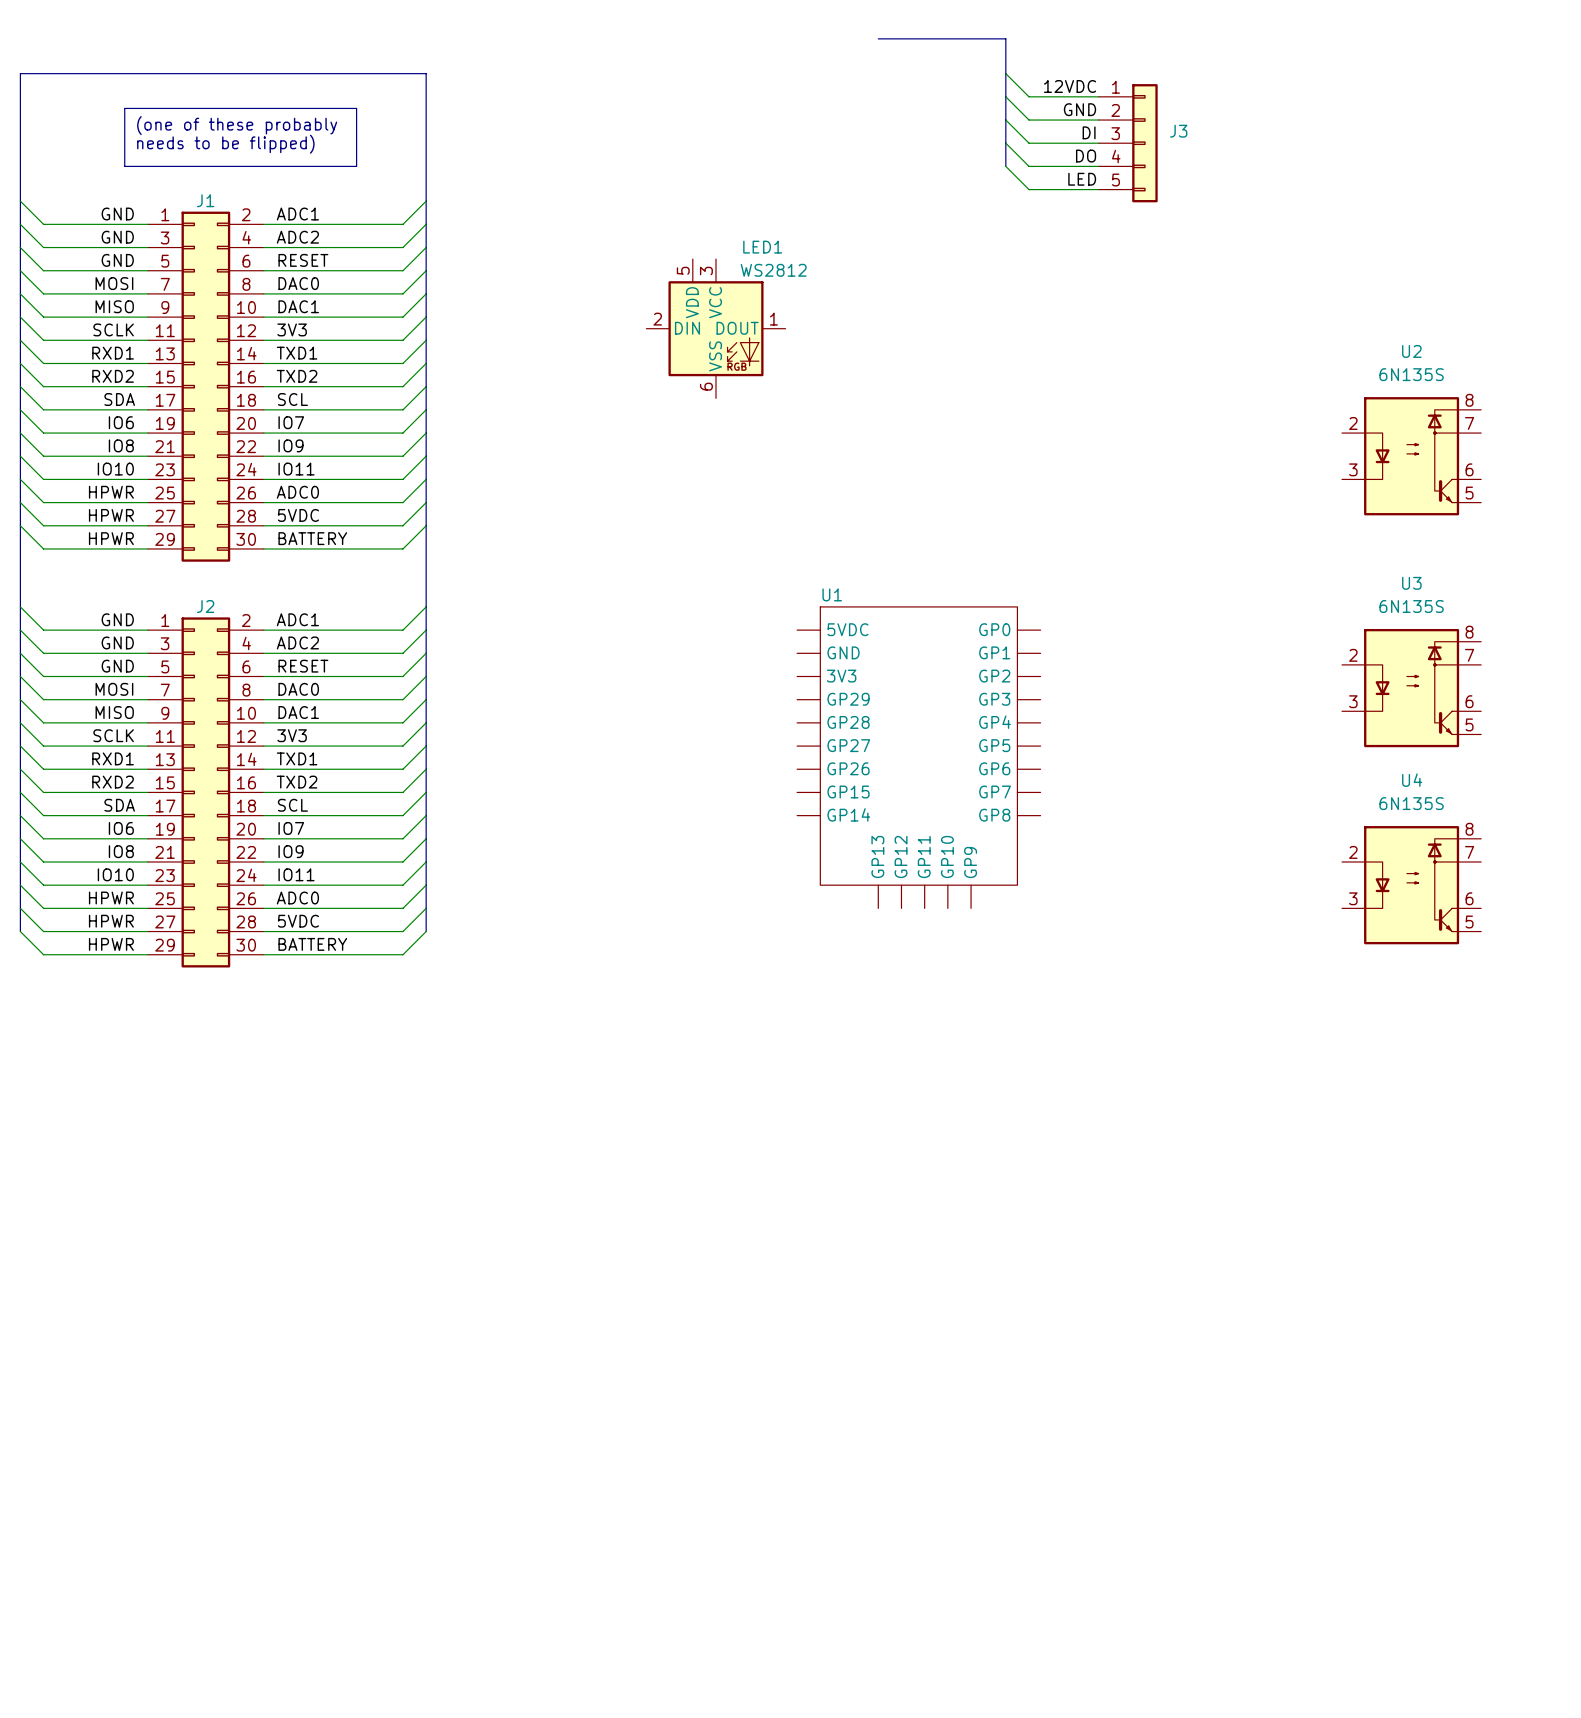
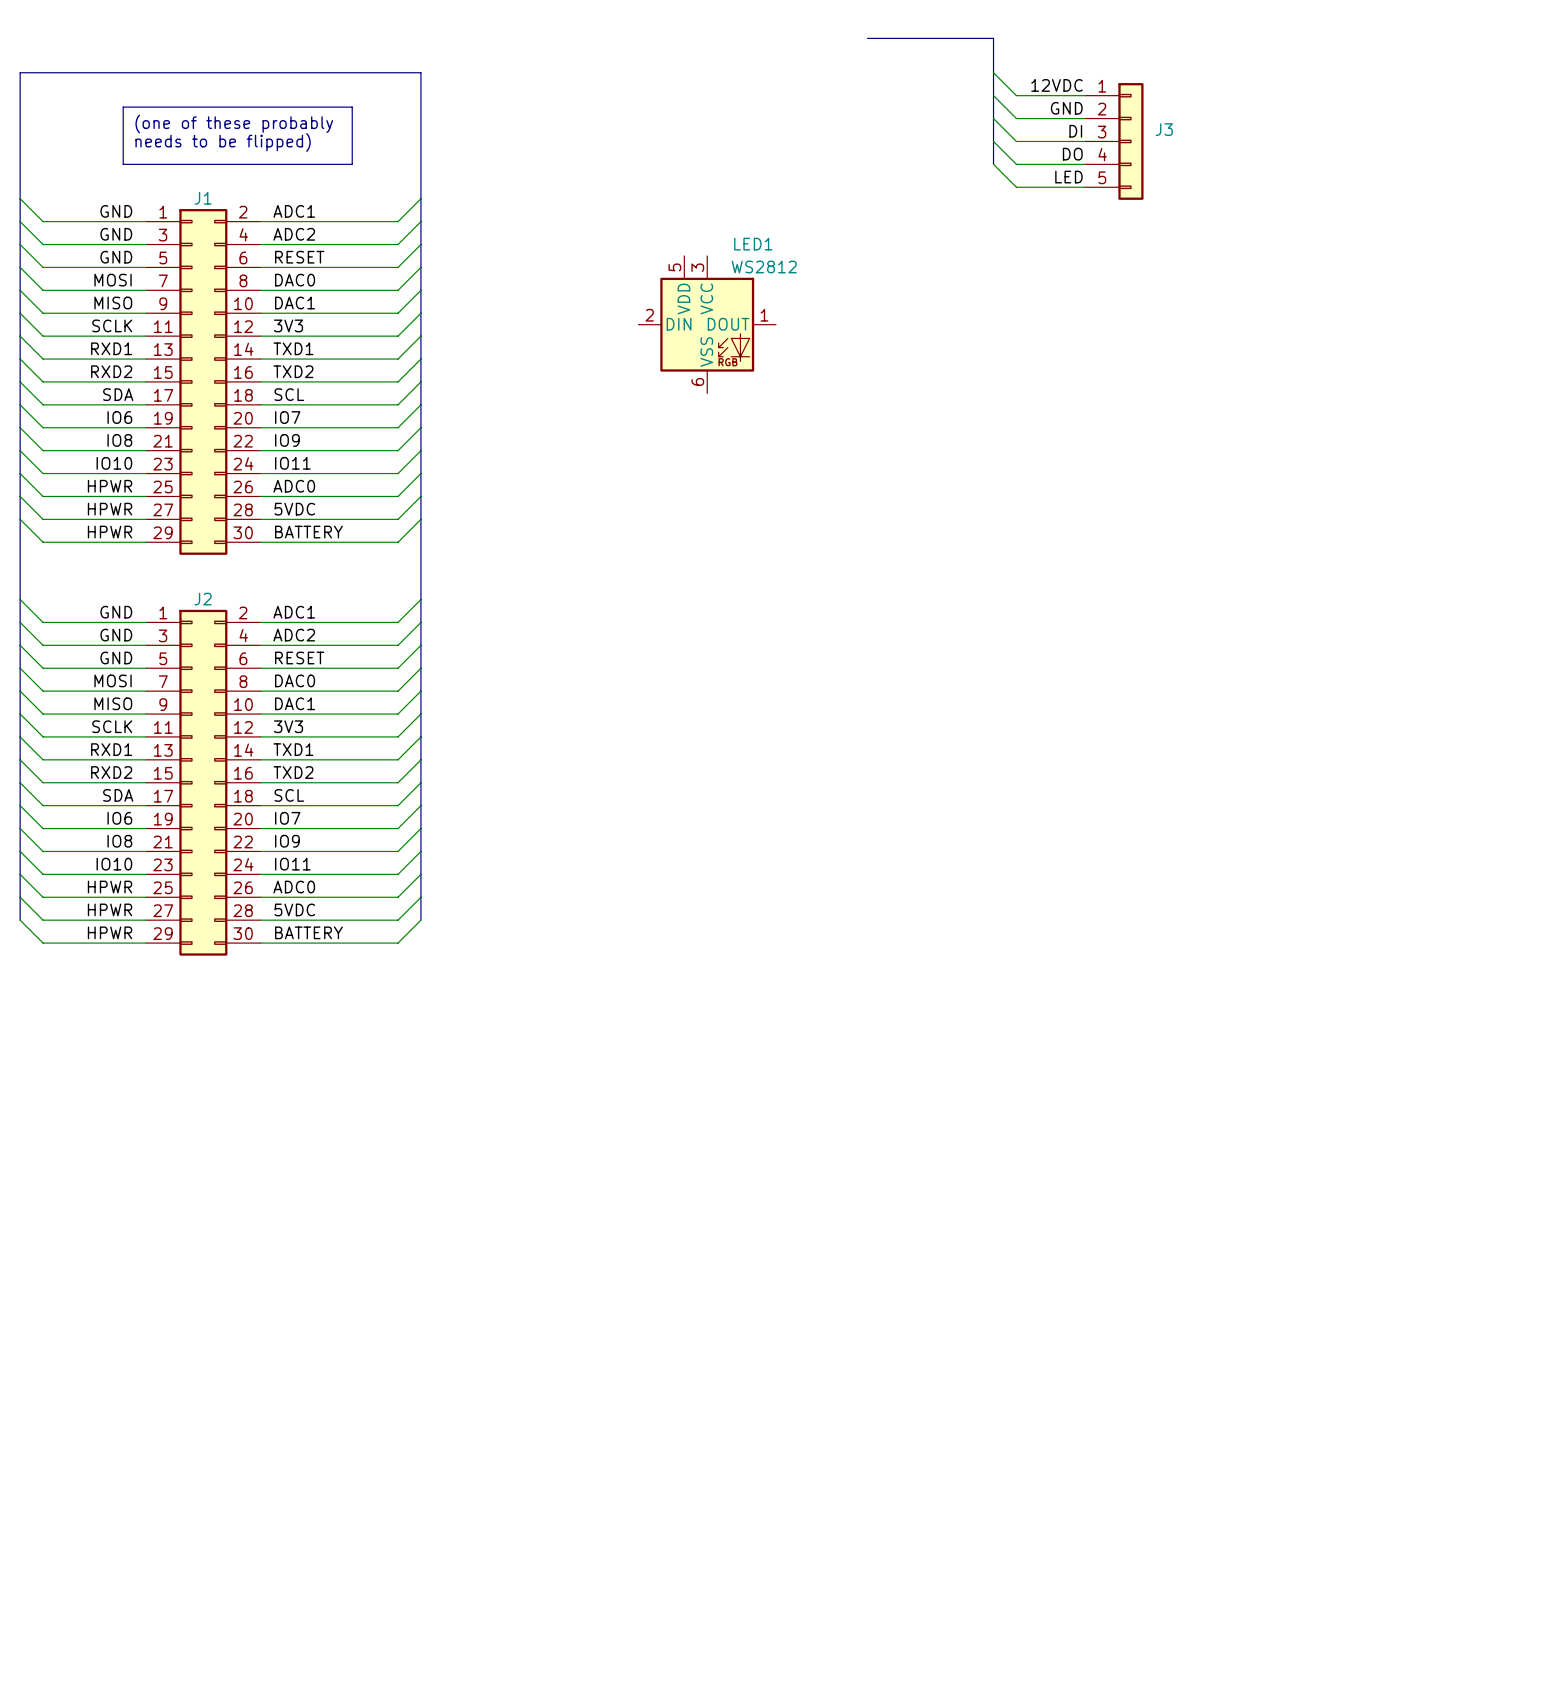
U2: 6N135S (1411, 456) -> none
U3: 6N135S (1411, 688) -> none
U1: (918, 757) -> none
U4: 6N135S (1411, 885) -> none

